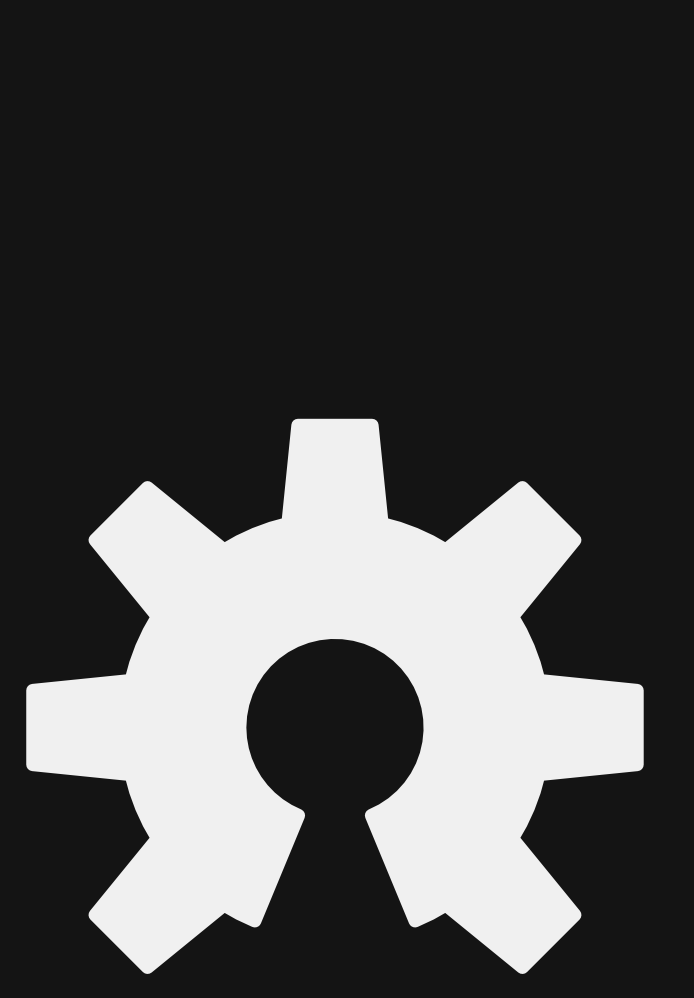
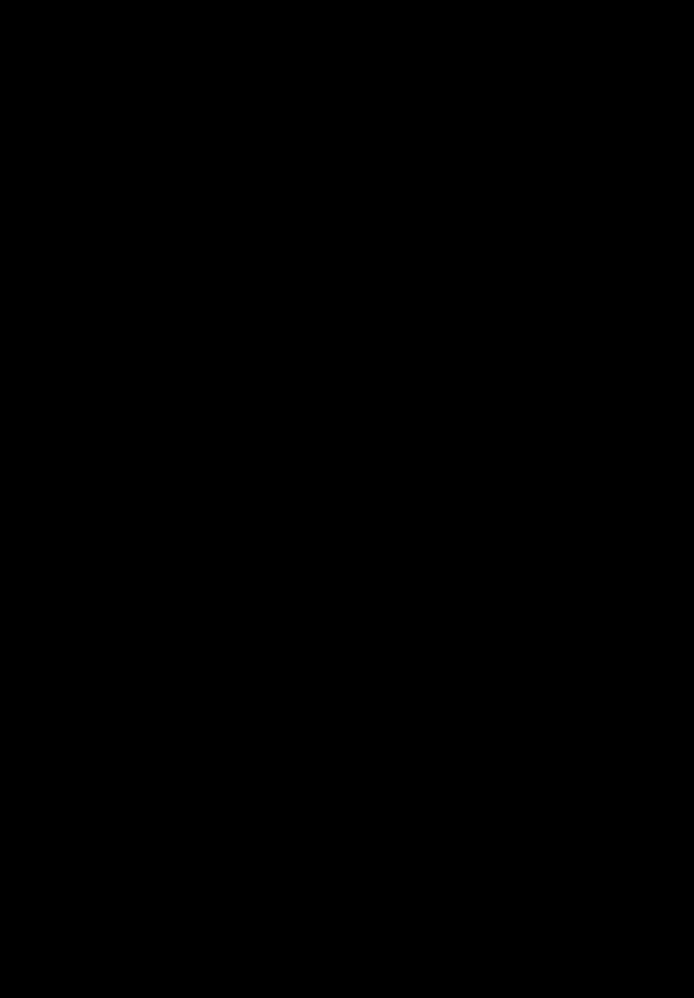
drawing: [26, 418, 644, 974] -> none

